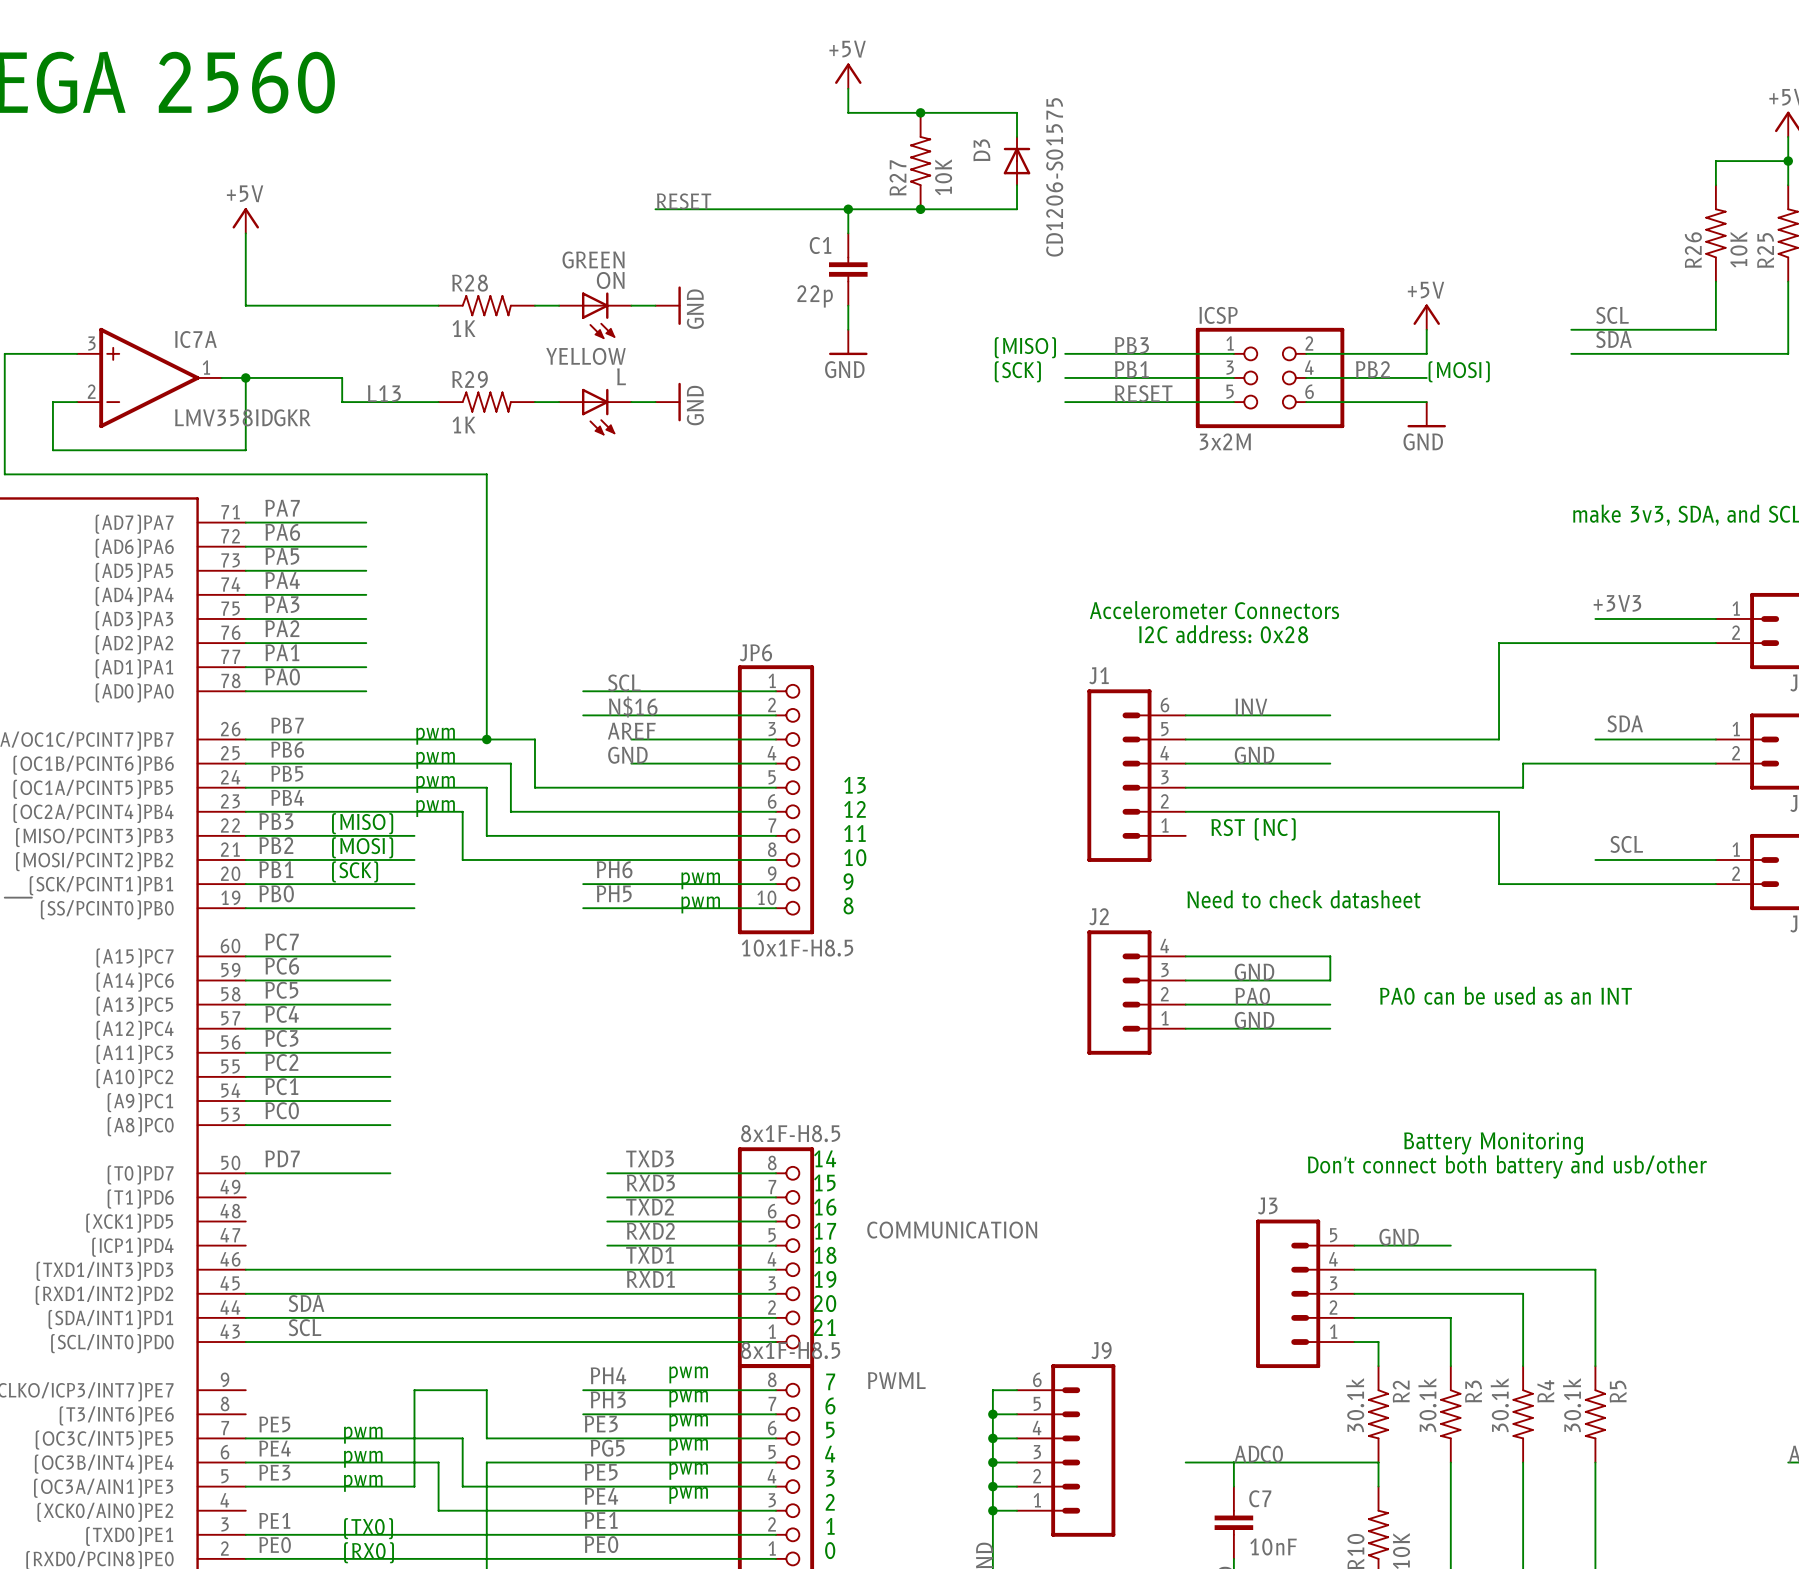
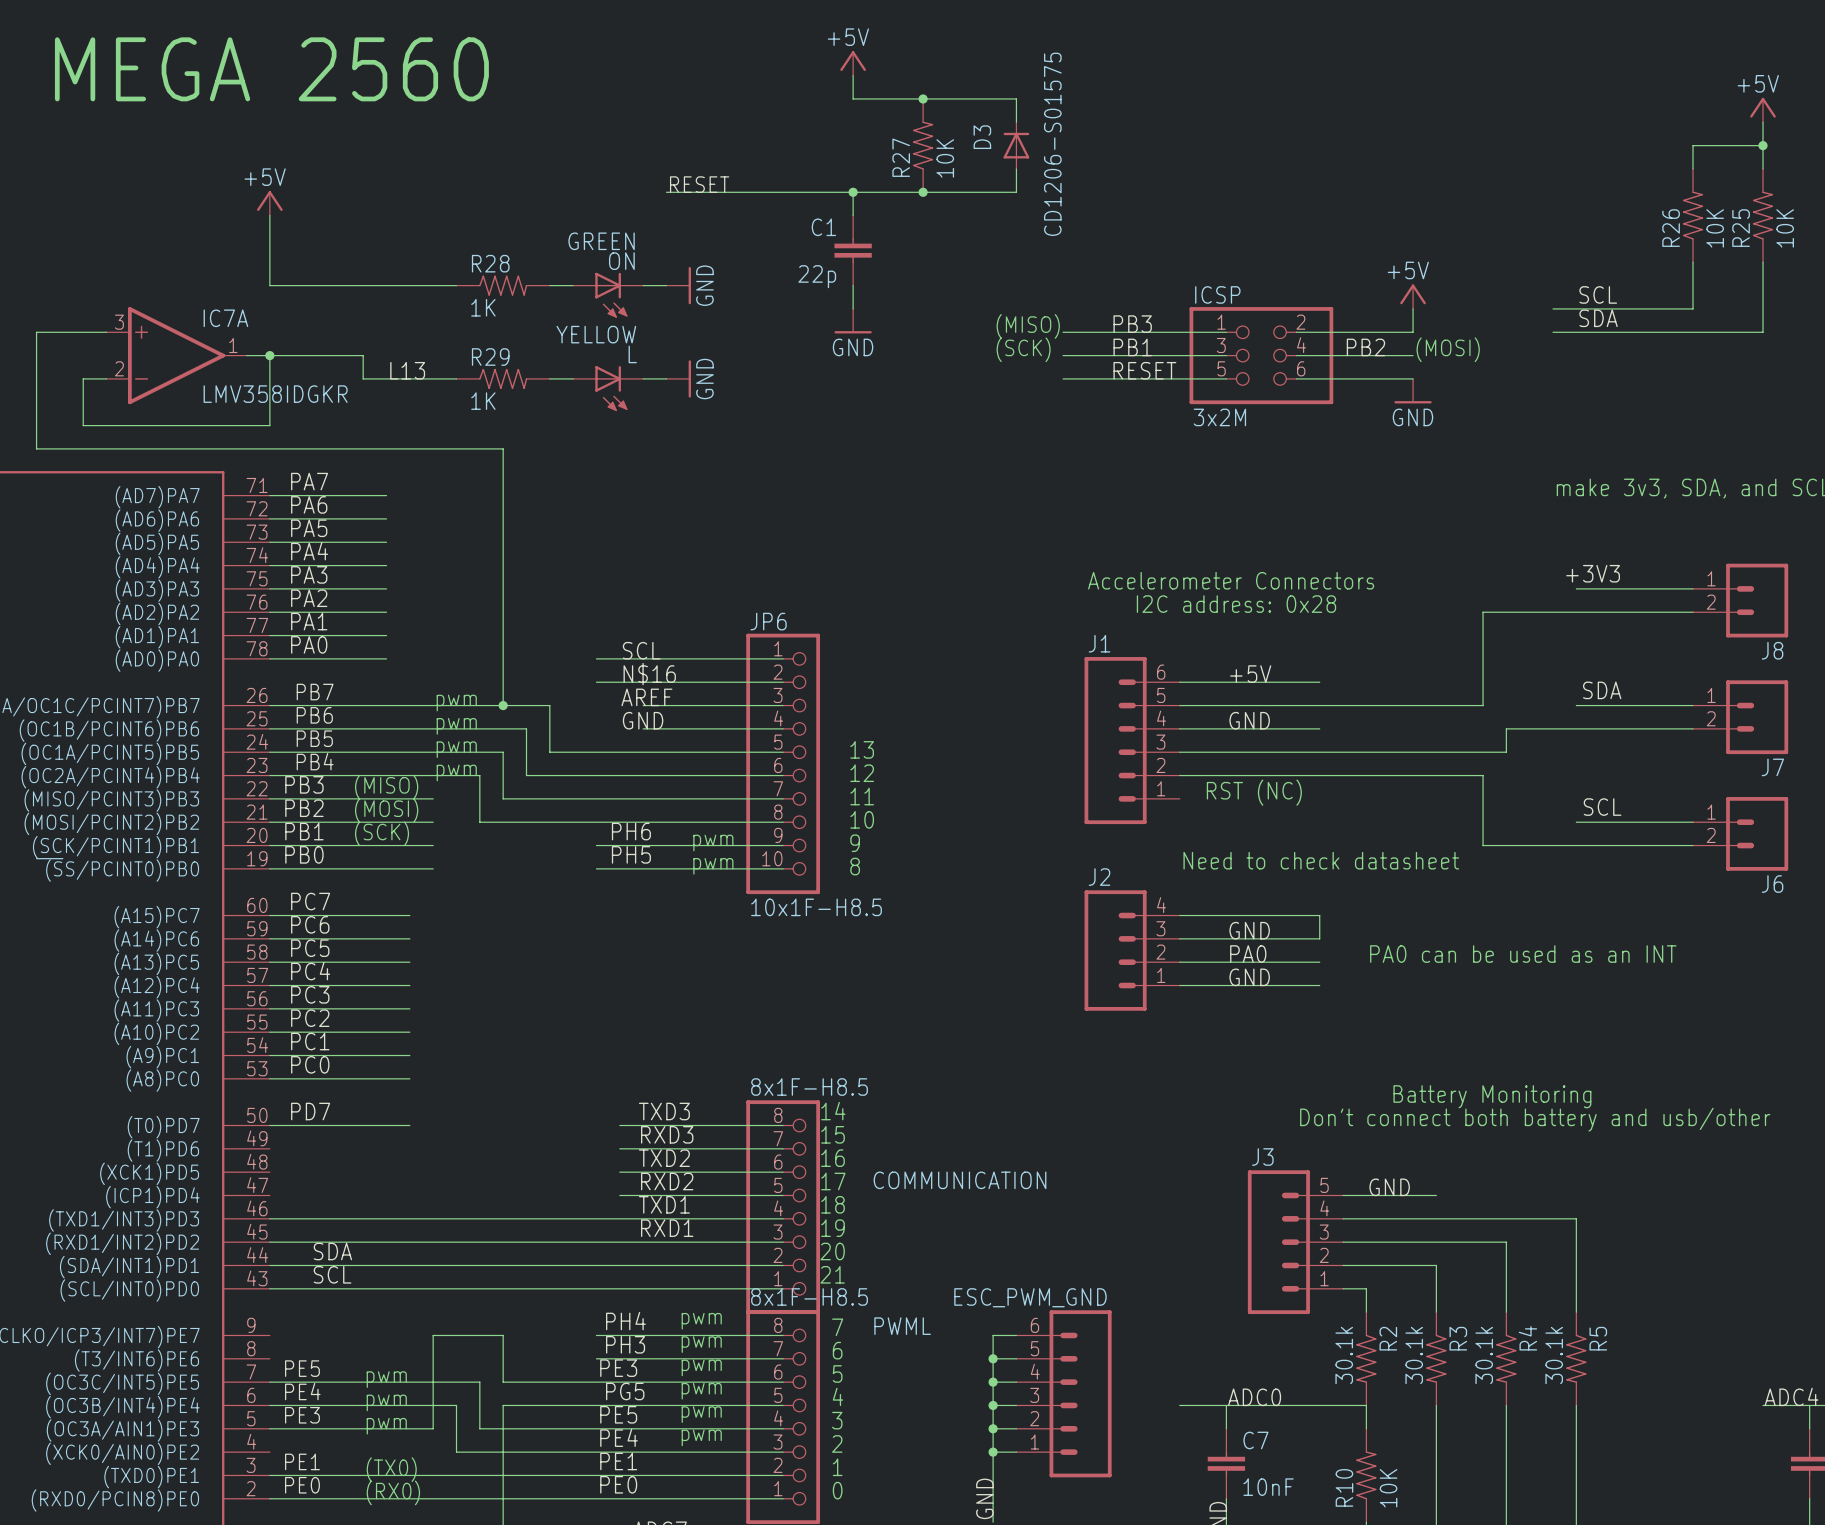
label: INV (1251, 707) -> +5V (1250, 674)
J9 name: J9 (1101, 1350) -> ESC_PWM_GND (1030, 1297)

